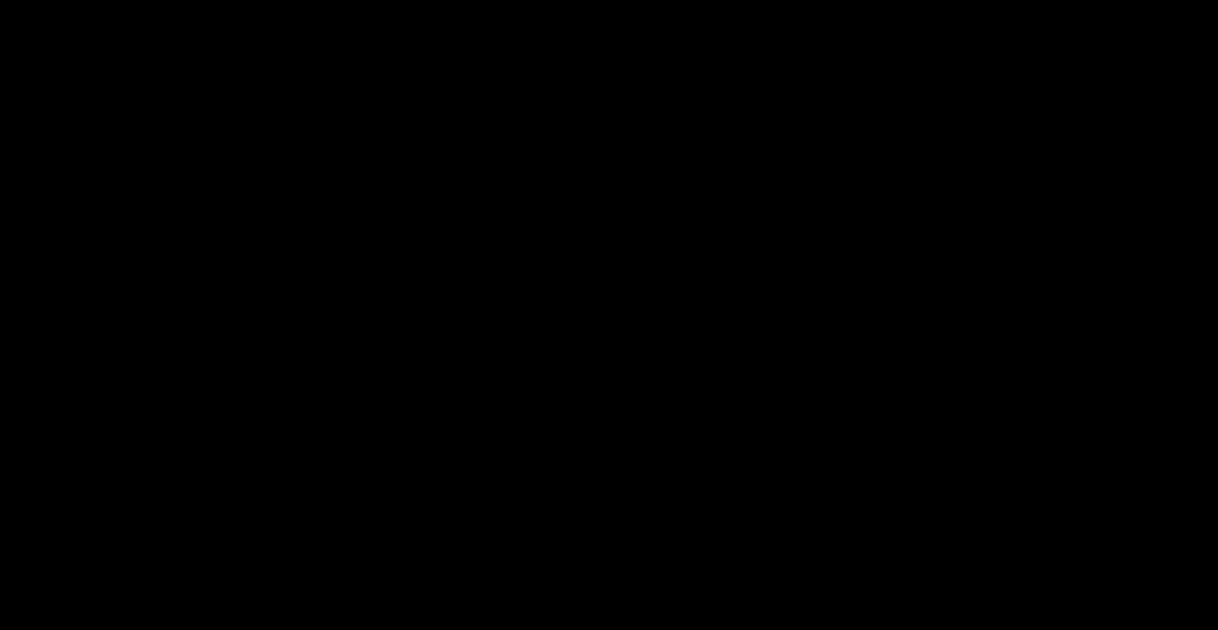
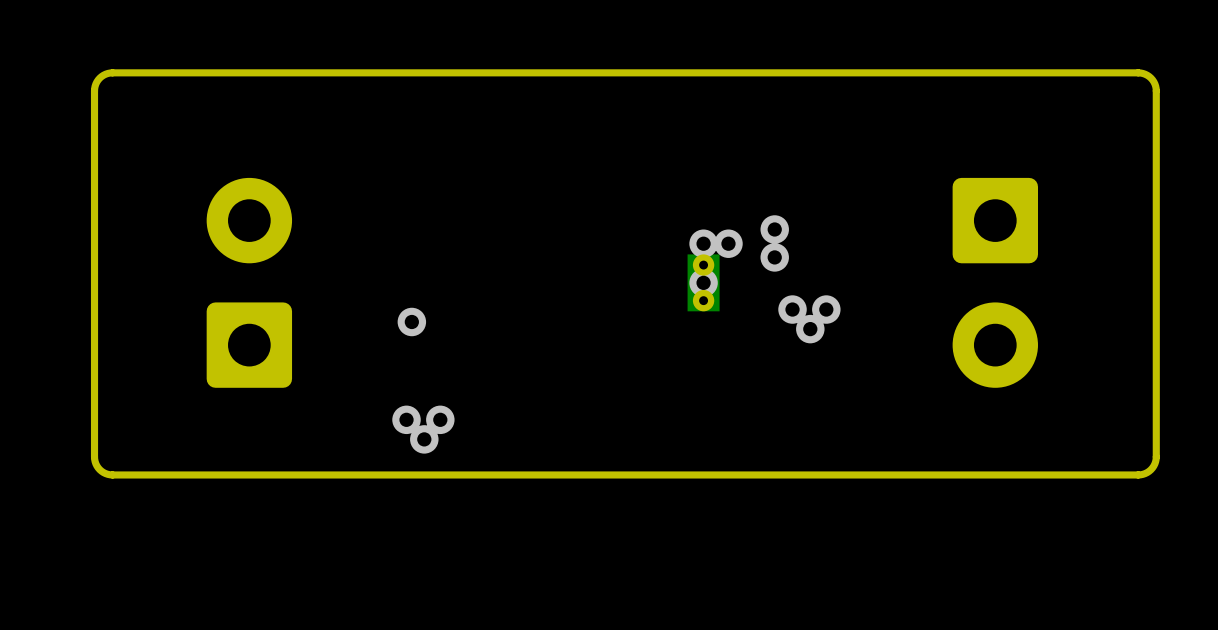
board edge: none -> (1138, 72) (105, 74) (98, 79) (94, 90) (95, 463) (103, 472) (112, 474) (1145, 473) (1152, 467) (1156, 456) (1156, 90) (1150, 78) (1138, 72)
via: none -> (774, 229)
via: none -> (703, 243)
via: none -> (728, 243)
via: none -> (774, 257)
part: none -> (249, 282)
part: none -> (703, 282)
via: none -> (703, 282)
part: none -> (995, 282)
via: none -> (792, 309)
via: none -> (826, 309)
via: none -> (411, 321)
via: none -> (810, 329)
via: none -> (406, 419)
via: none -> (440, 419)
via: none -> (424, 439)

